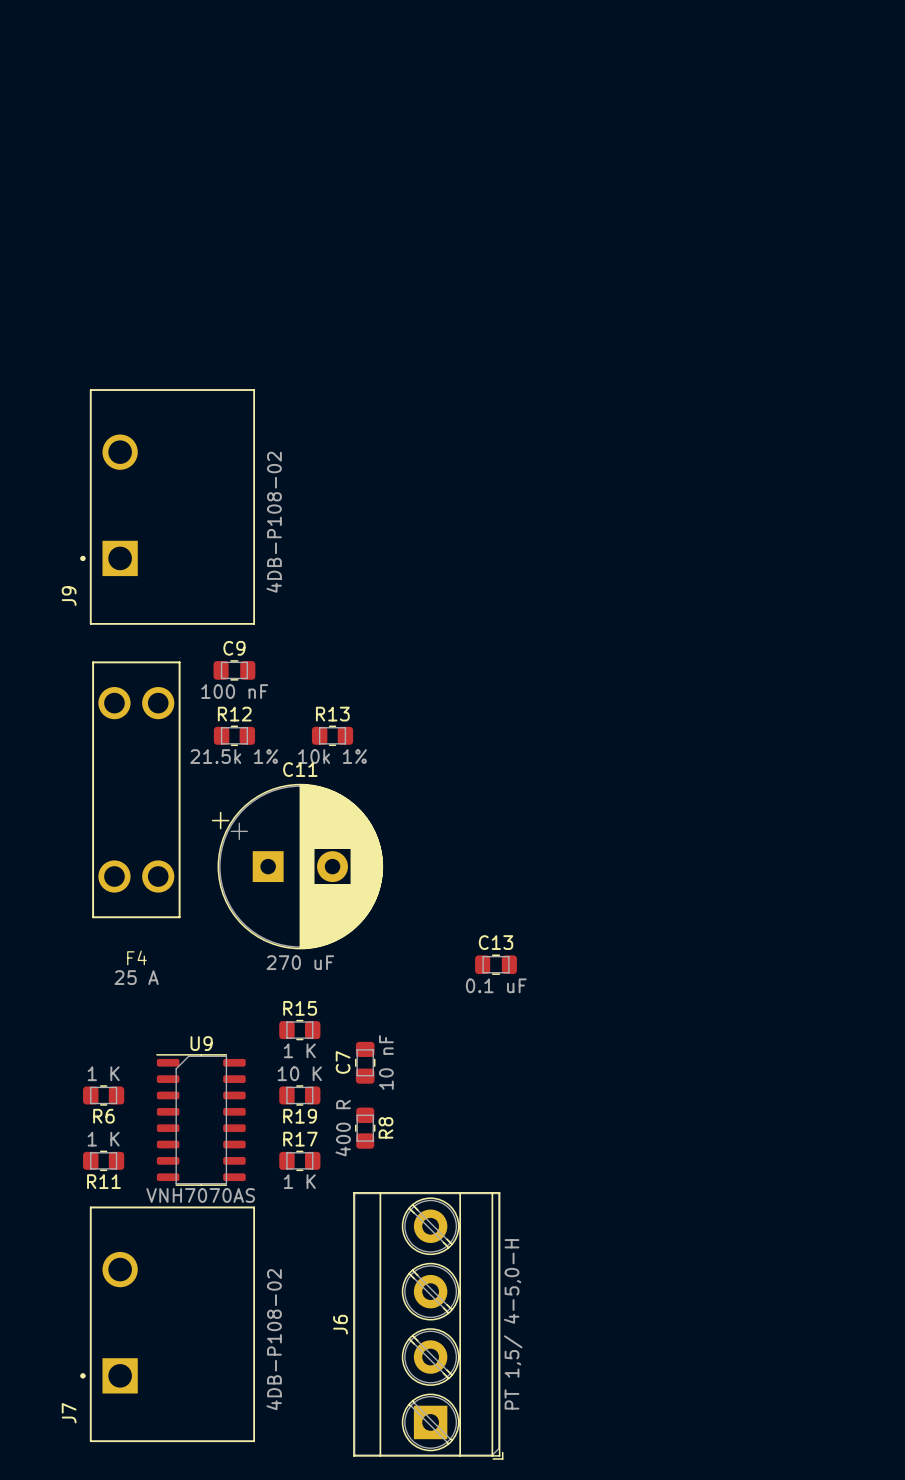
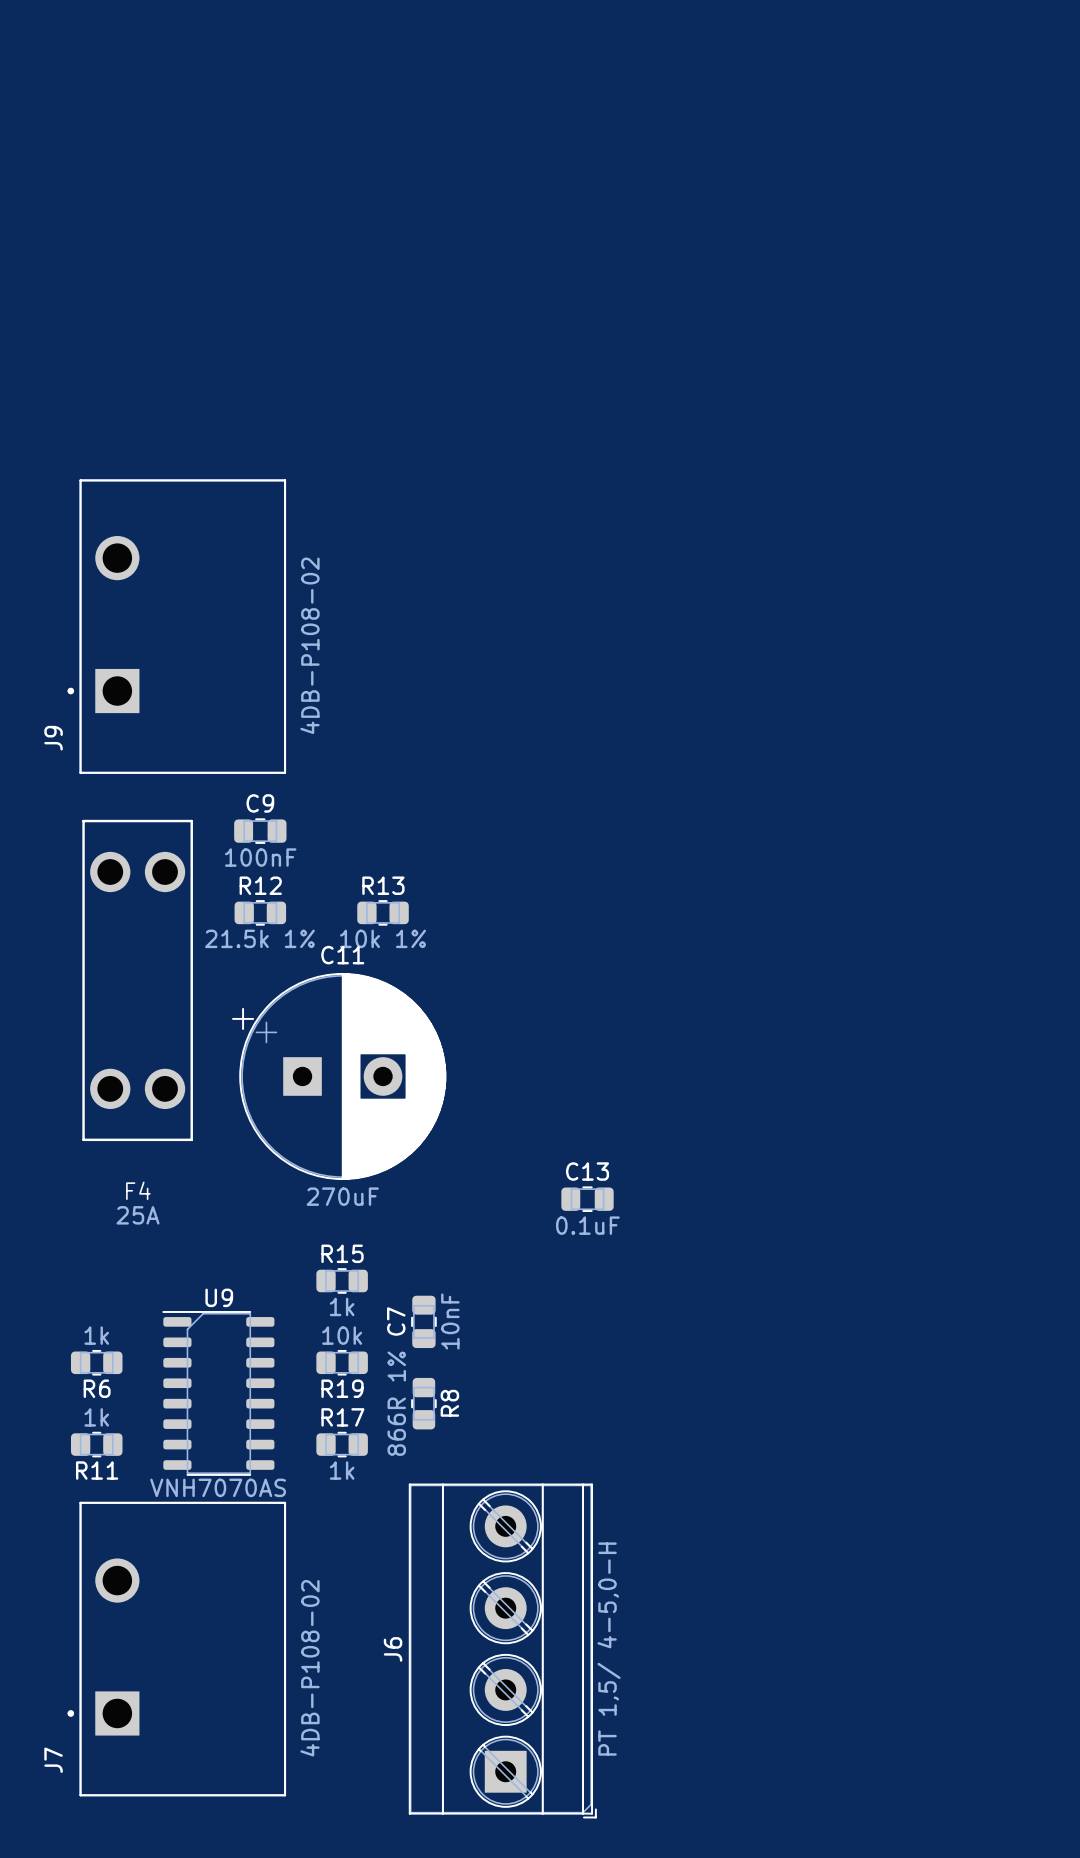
C9 value: 100 nF (234, 691) -> 100nF (260, 857)
C11 value: 270 uF (300, 962) -> 270uF (342, 1196)
F4 value: 25 A (136, 977) -> 25A (138, 1215)
C13 value: 0.1 uF (496, 985) -> 0.1uF (587, 1225)
R15 value: 1 K (299, 1050) -> 1k (342, 1306)
C7 value: 10 nF (386, 1062) -> 10nF (450, 1321)
R6 value: 1 K (103, 1073) -> 1k (96, 1335)
R19 value: 10 K (299, 1073) -> 10k (342, 1335)
R8 value: 400 R (343, 1128) -> 866R 1% (396, 1403)
R11 value: 1 K (103, 1139) -> 1k (96, 1417)
R17 value: 1 K (299, 1181) -> 1k (342, 1470)

